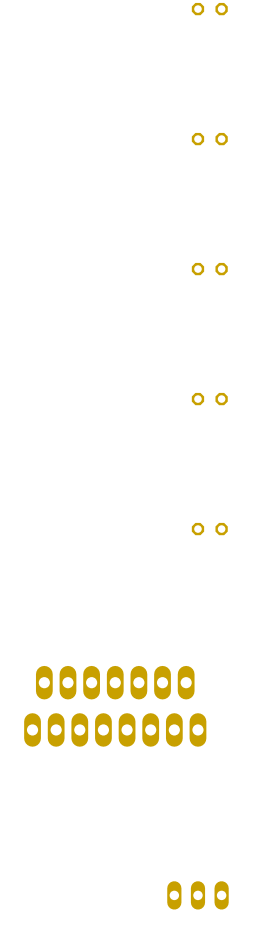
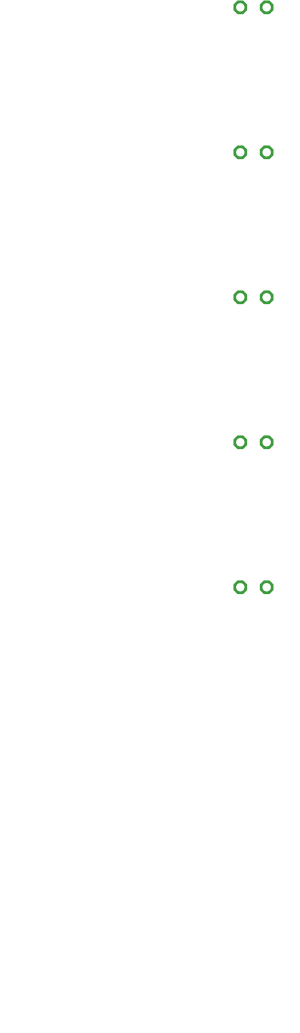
part: (115, 706) -> none
part: (197, 895) -> none

